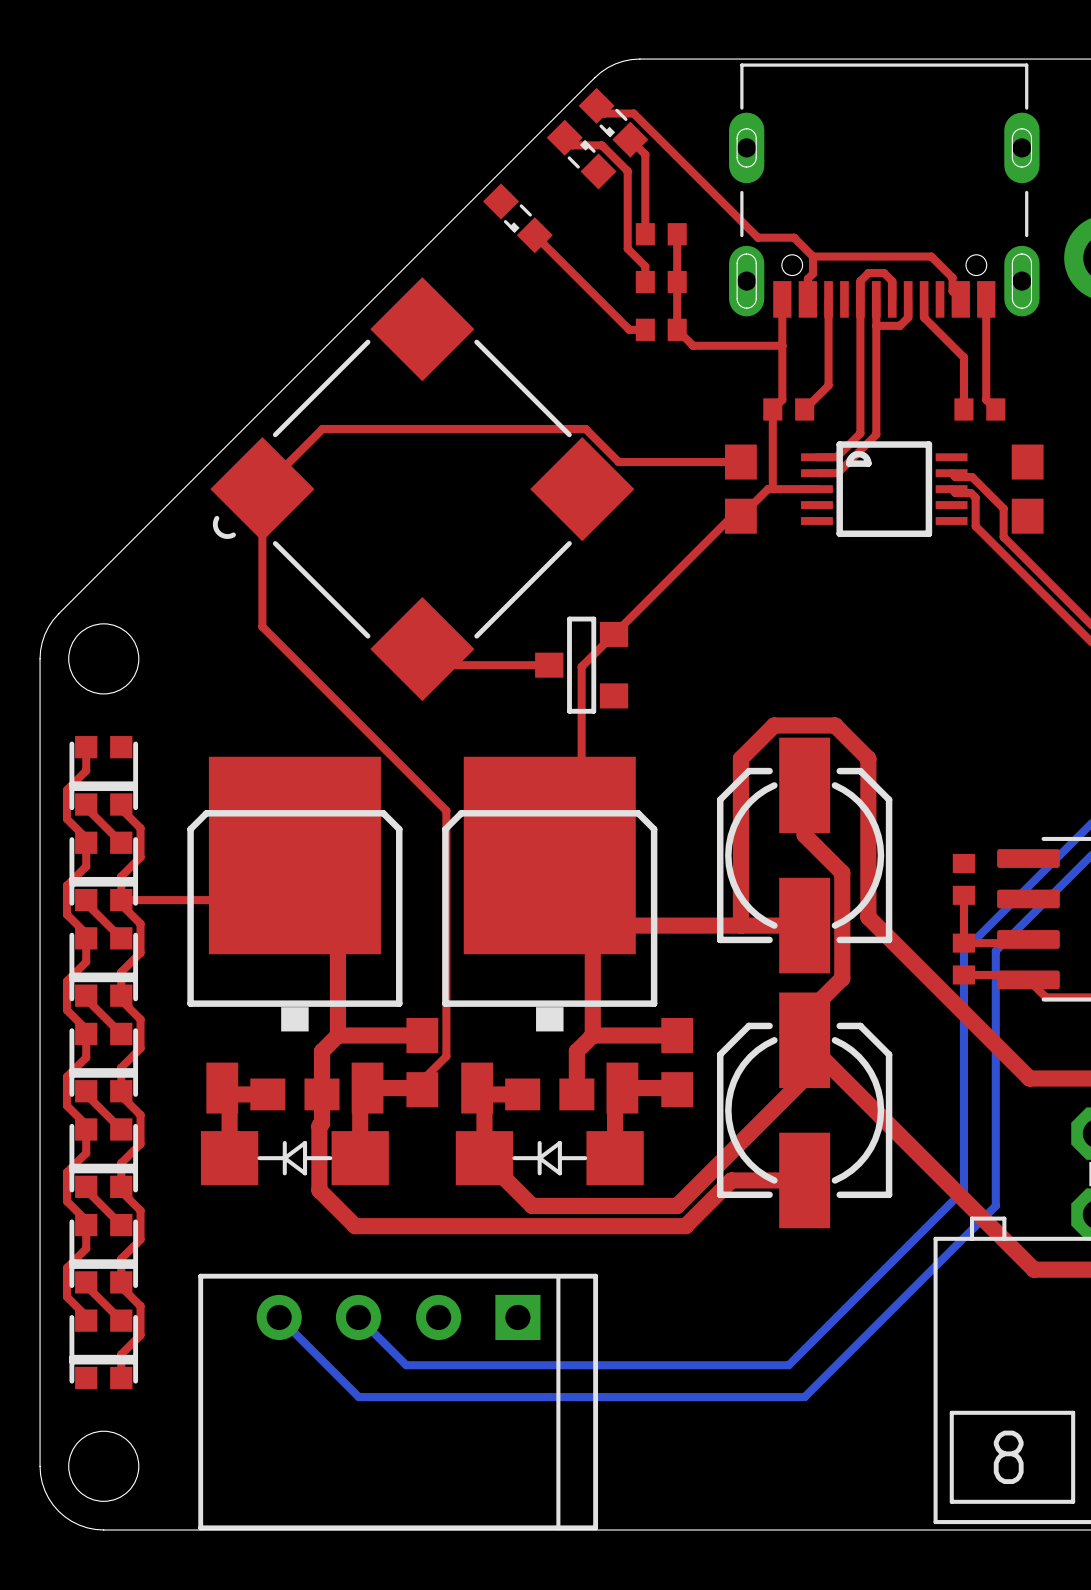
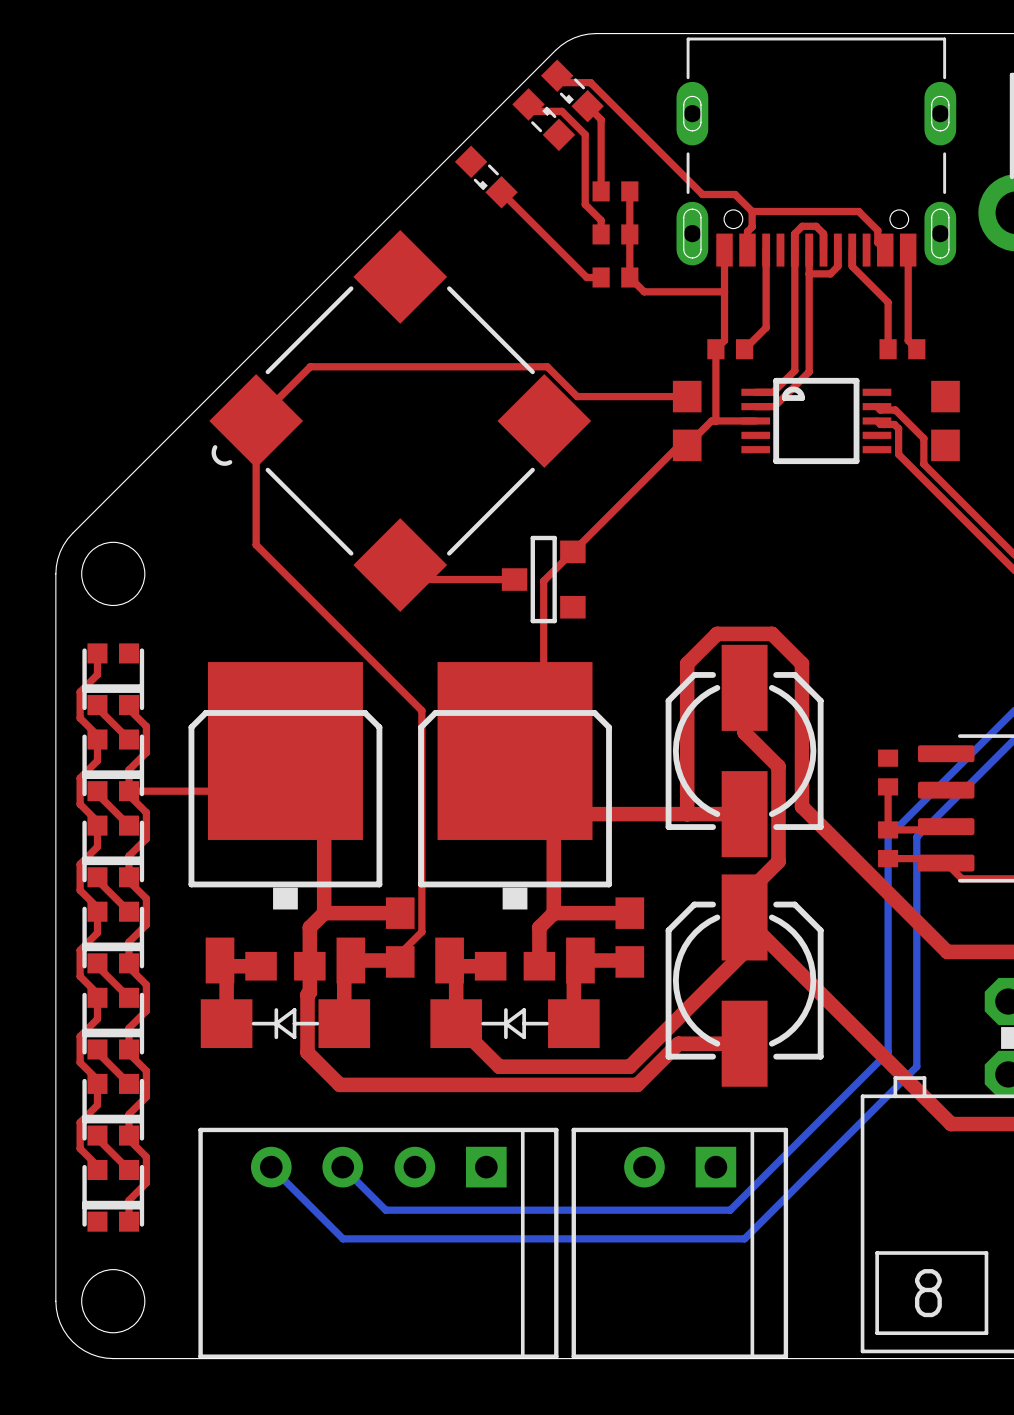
part: none -> (679, 1243)

